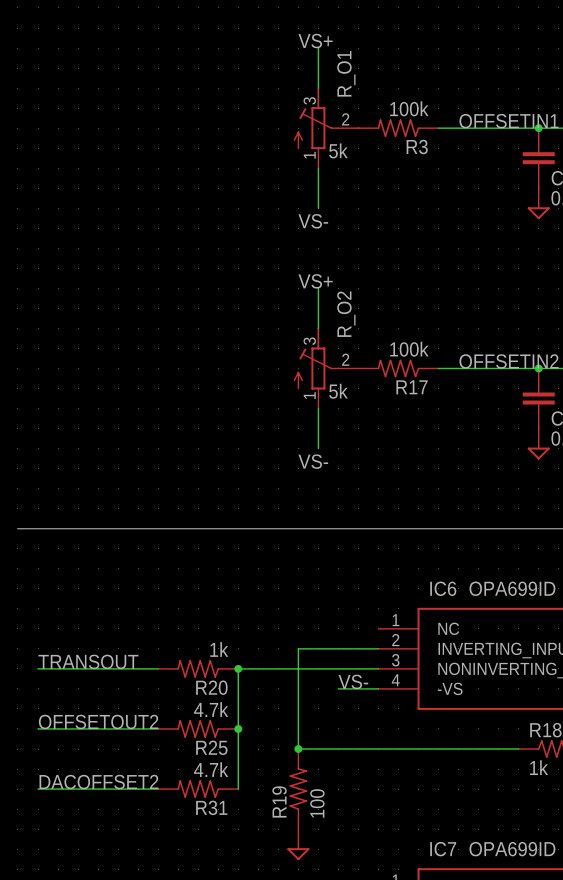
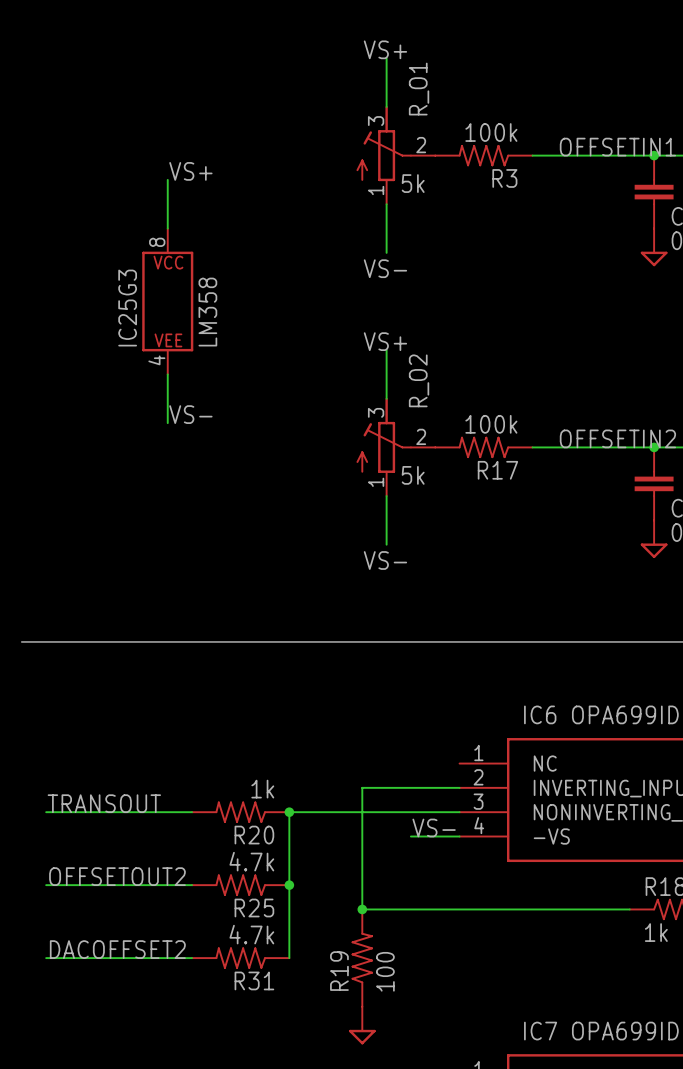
label: none -> VS+ (190, 171)
wire: none -> (167, 179) (167, 228)
IC25G3: none -> LM358 (167, 301)
wire: none -> (167, 374) (167, 423)
label: none -> VS- (190, 414)

